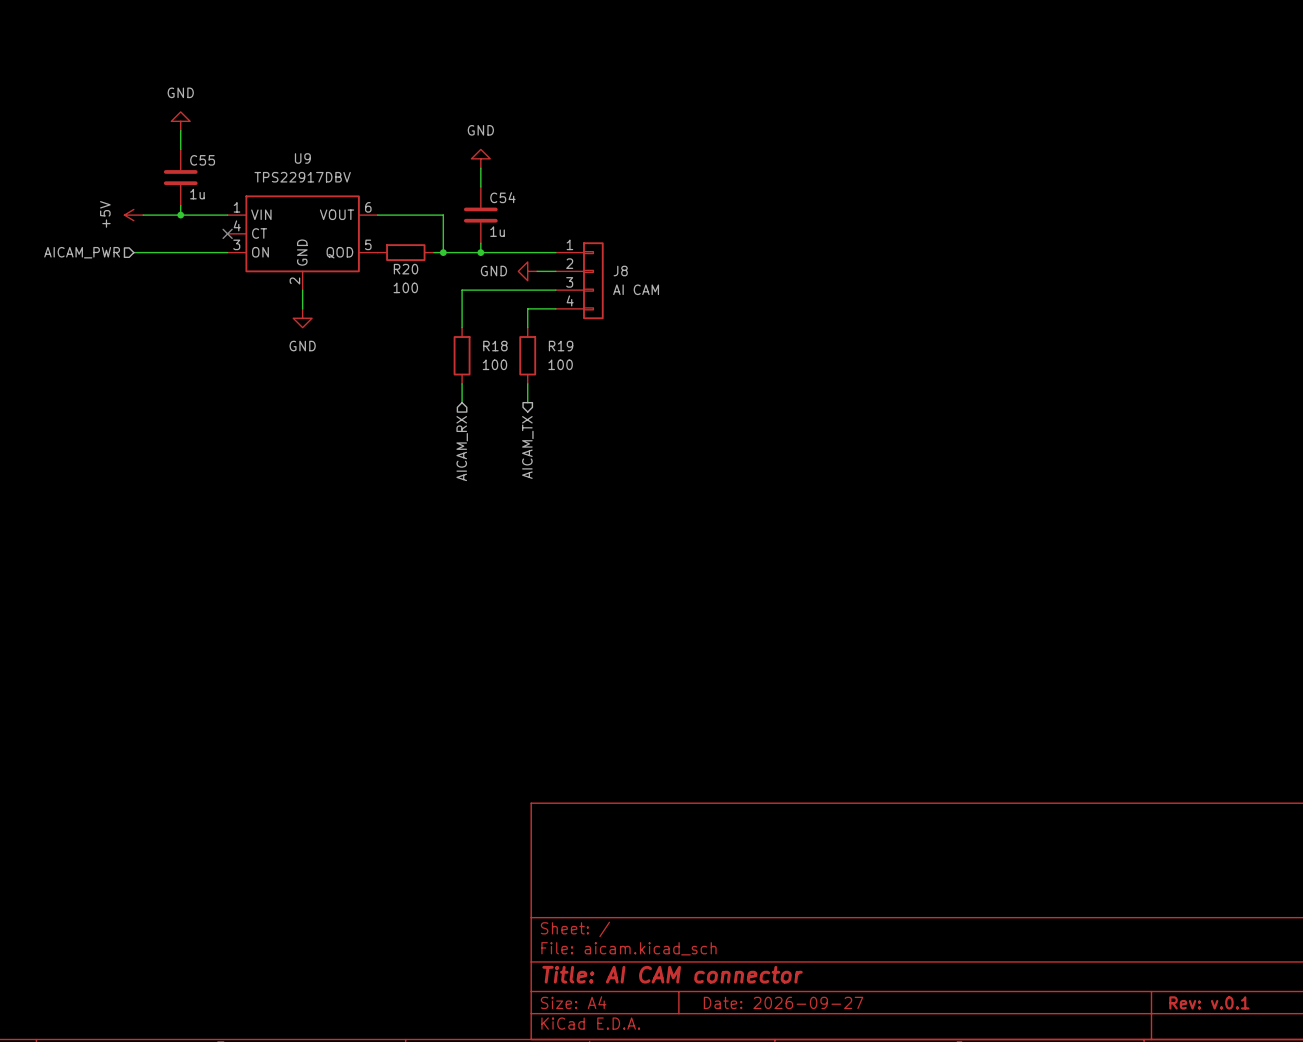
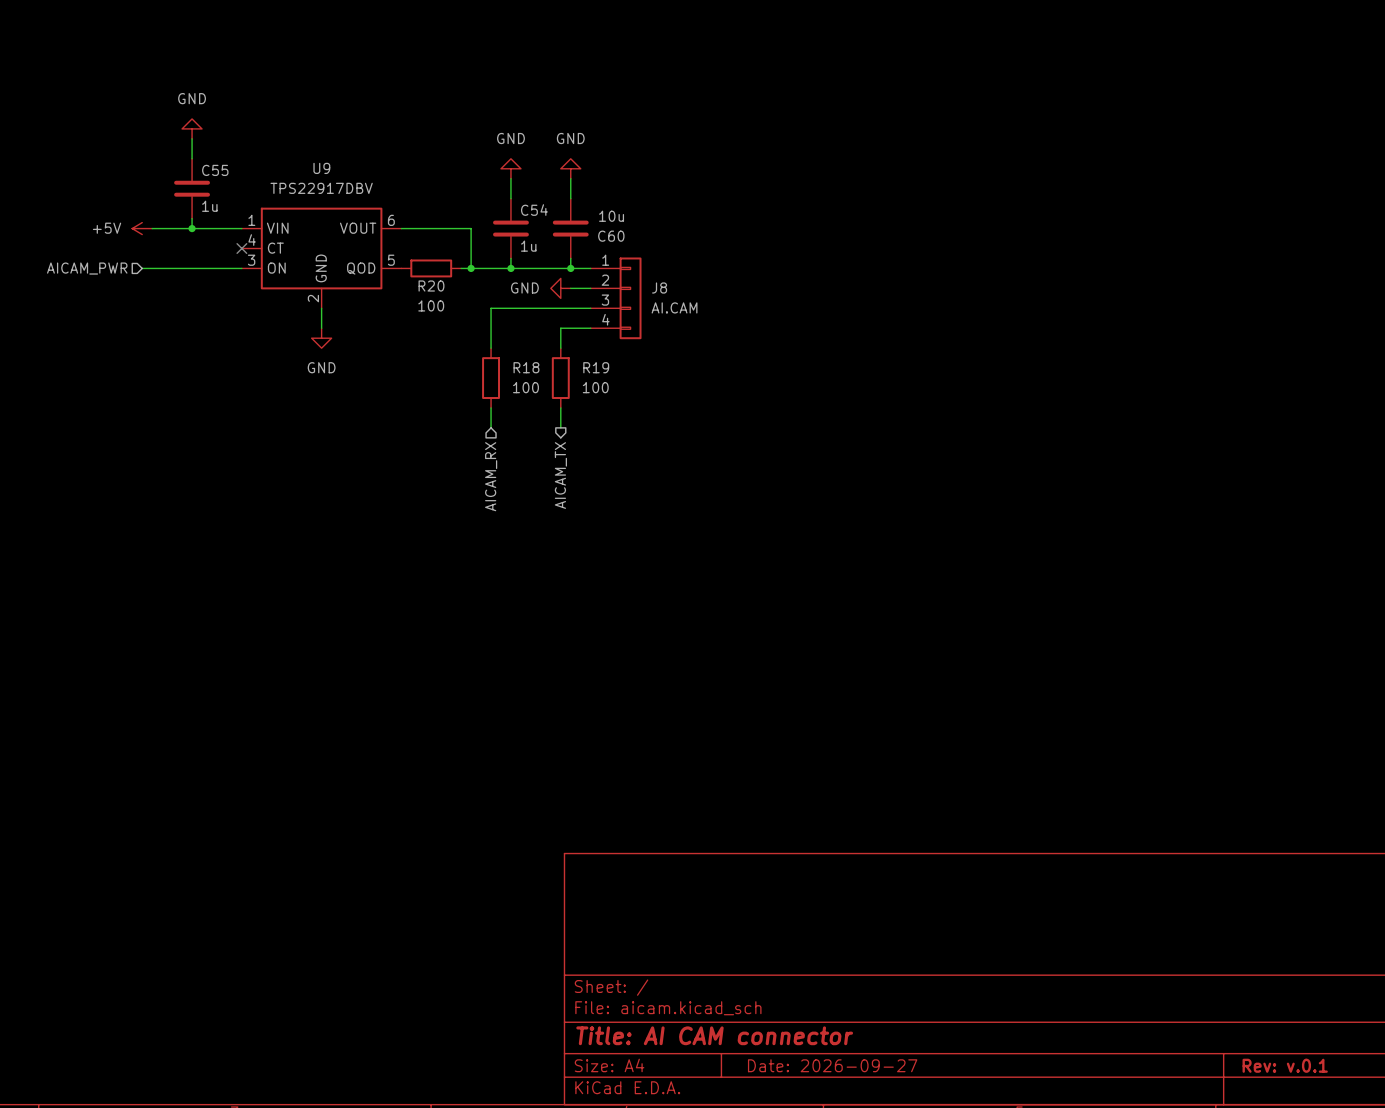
power symbol: none -> GND (570, 168)
wire: none -> (570, 178) (570, 198)
power symbol text rotation: 0° (105, 214) -> 90° clockwise (107, 228)
C60: none -> 10u (570, 228)
wire: none -> (570, 258) (570, 268)
junction: none -> (570, 268)
J8 value: AI CAM (636, 289) -> AI.CAM (674, 307)

